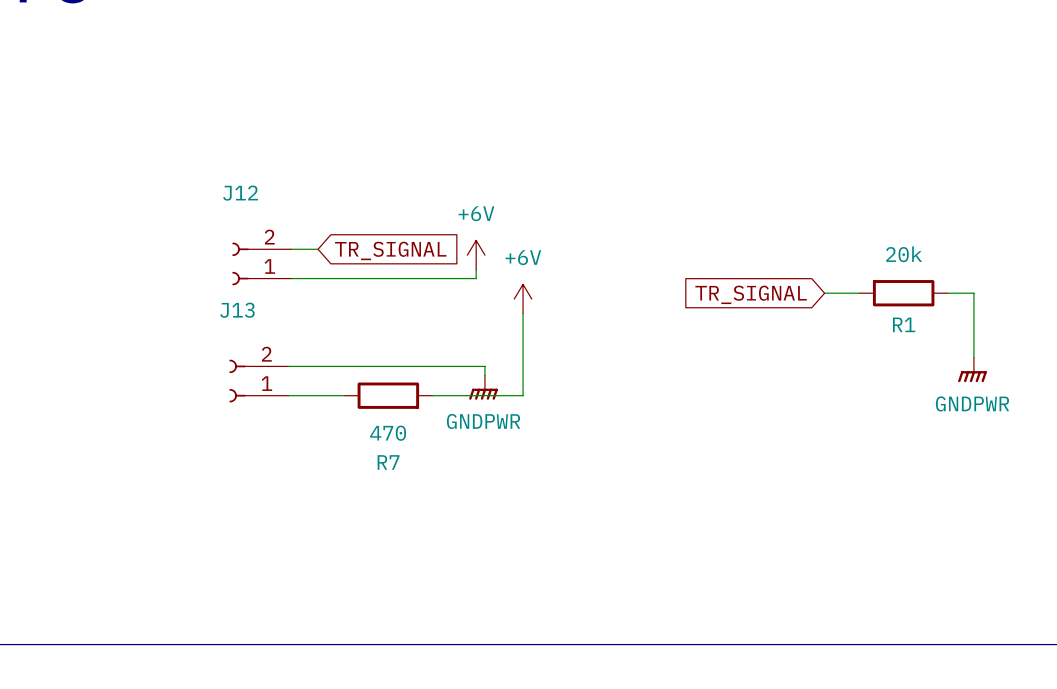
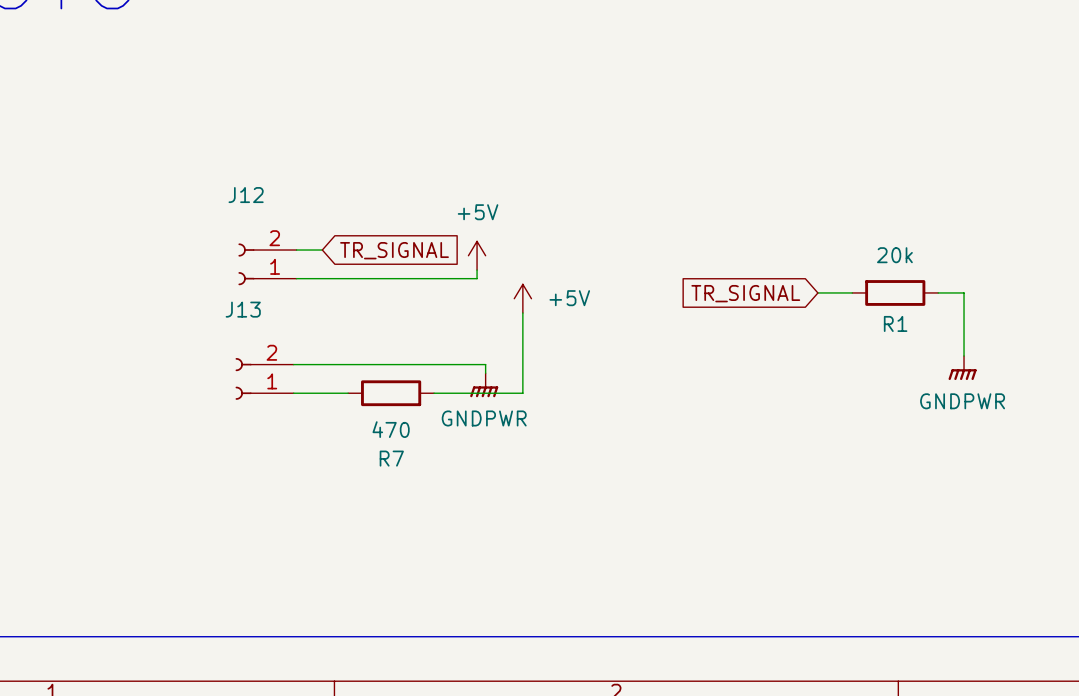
power symbol: +6V (476, 255) -> +5V (477, 255)
power symbol: +6V (523, 299) -> +5V (522, 298)

